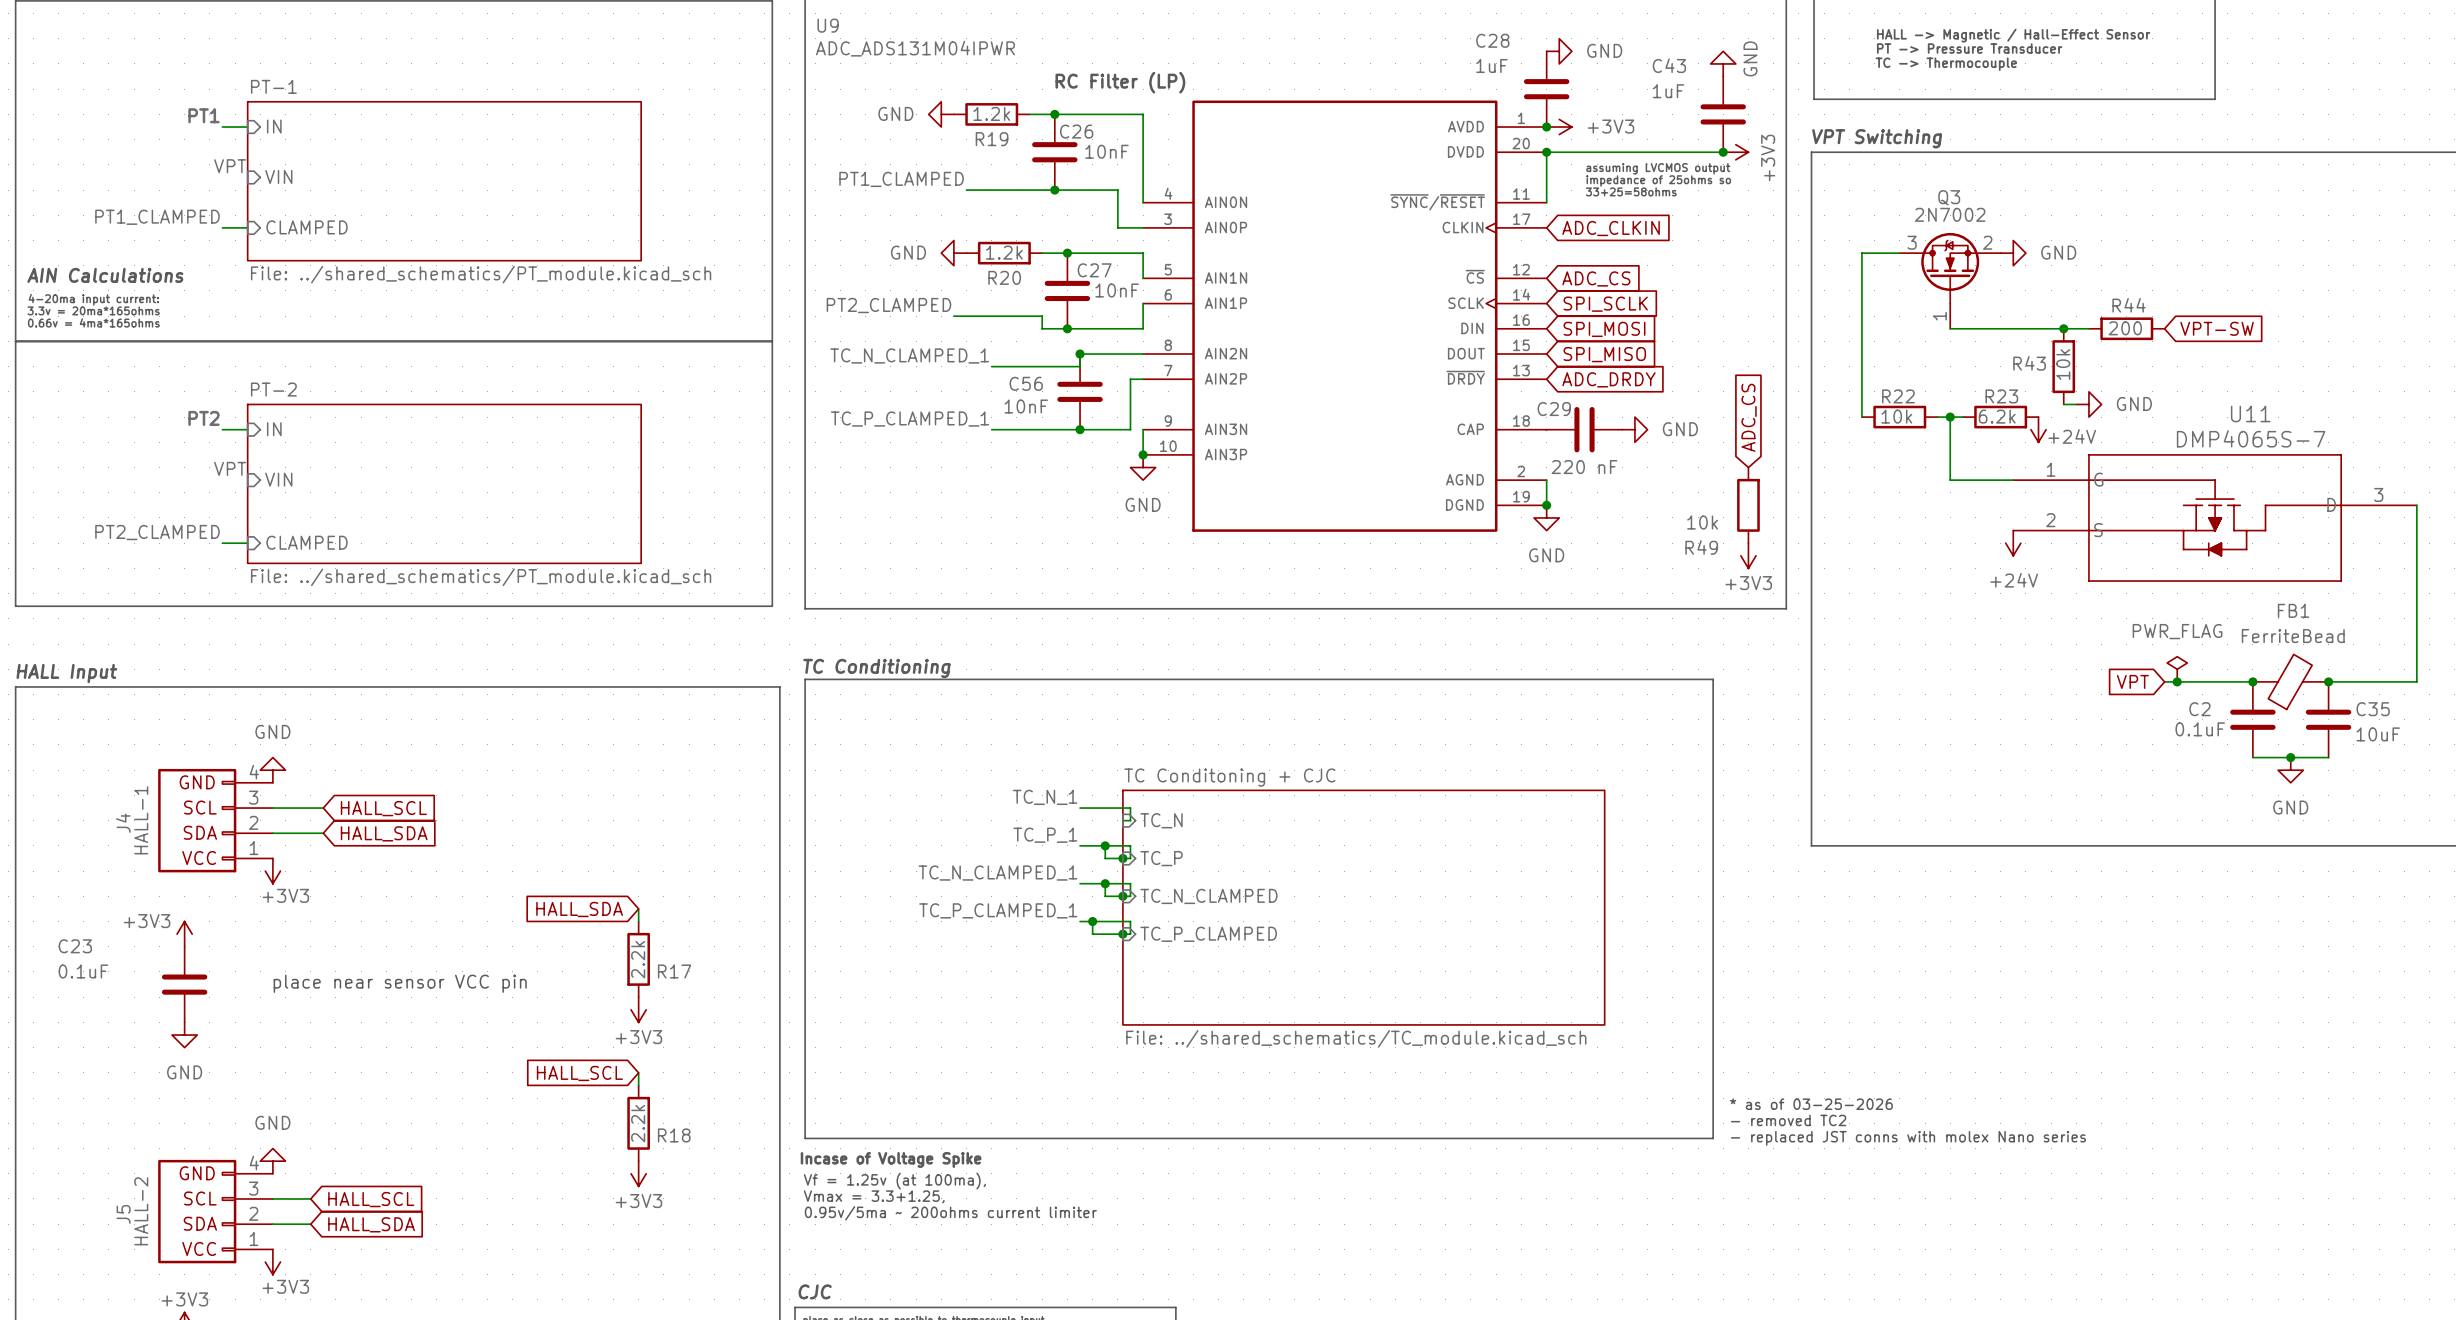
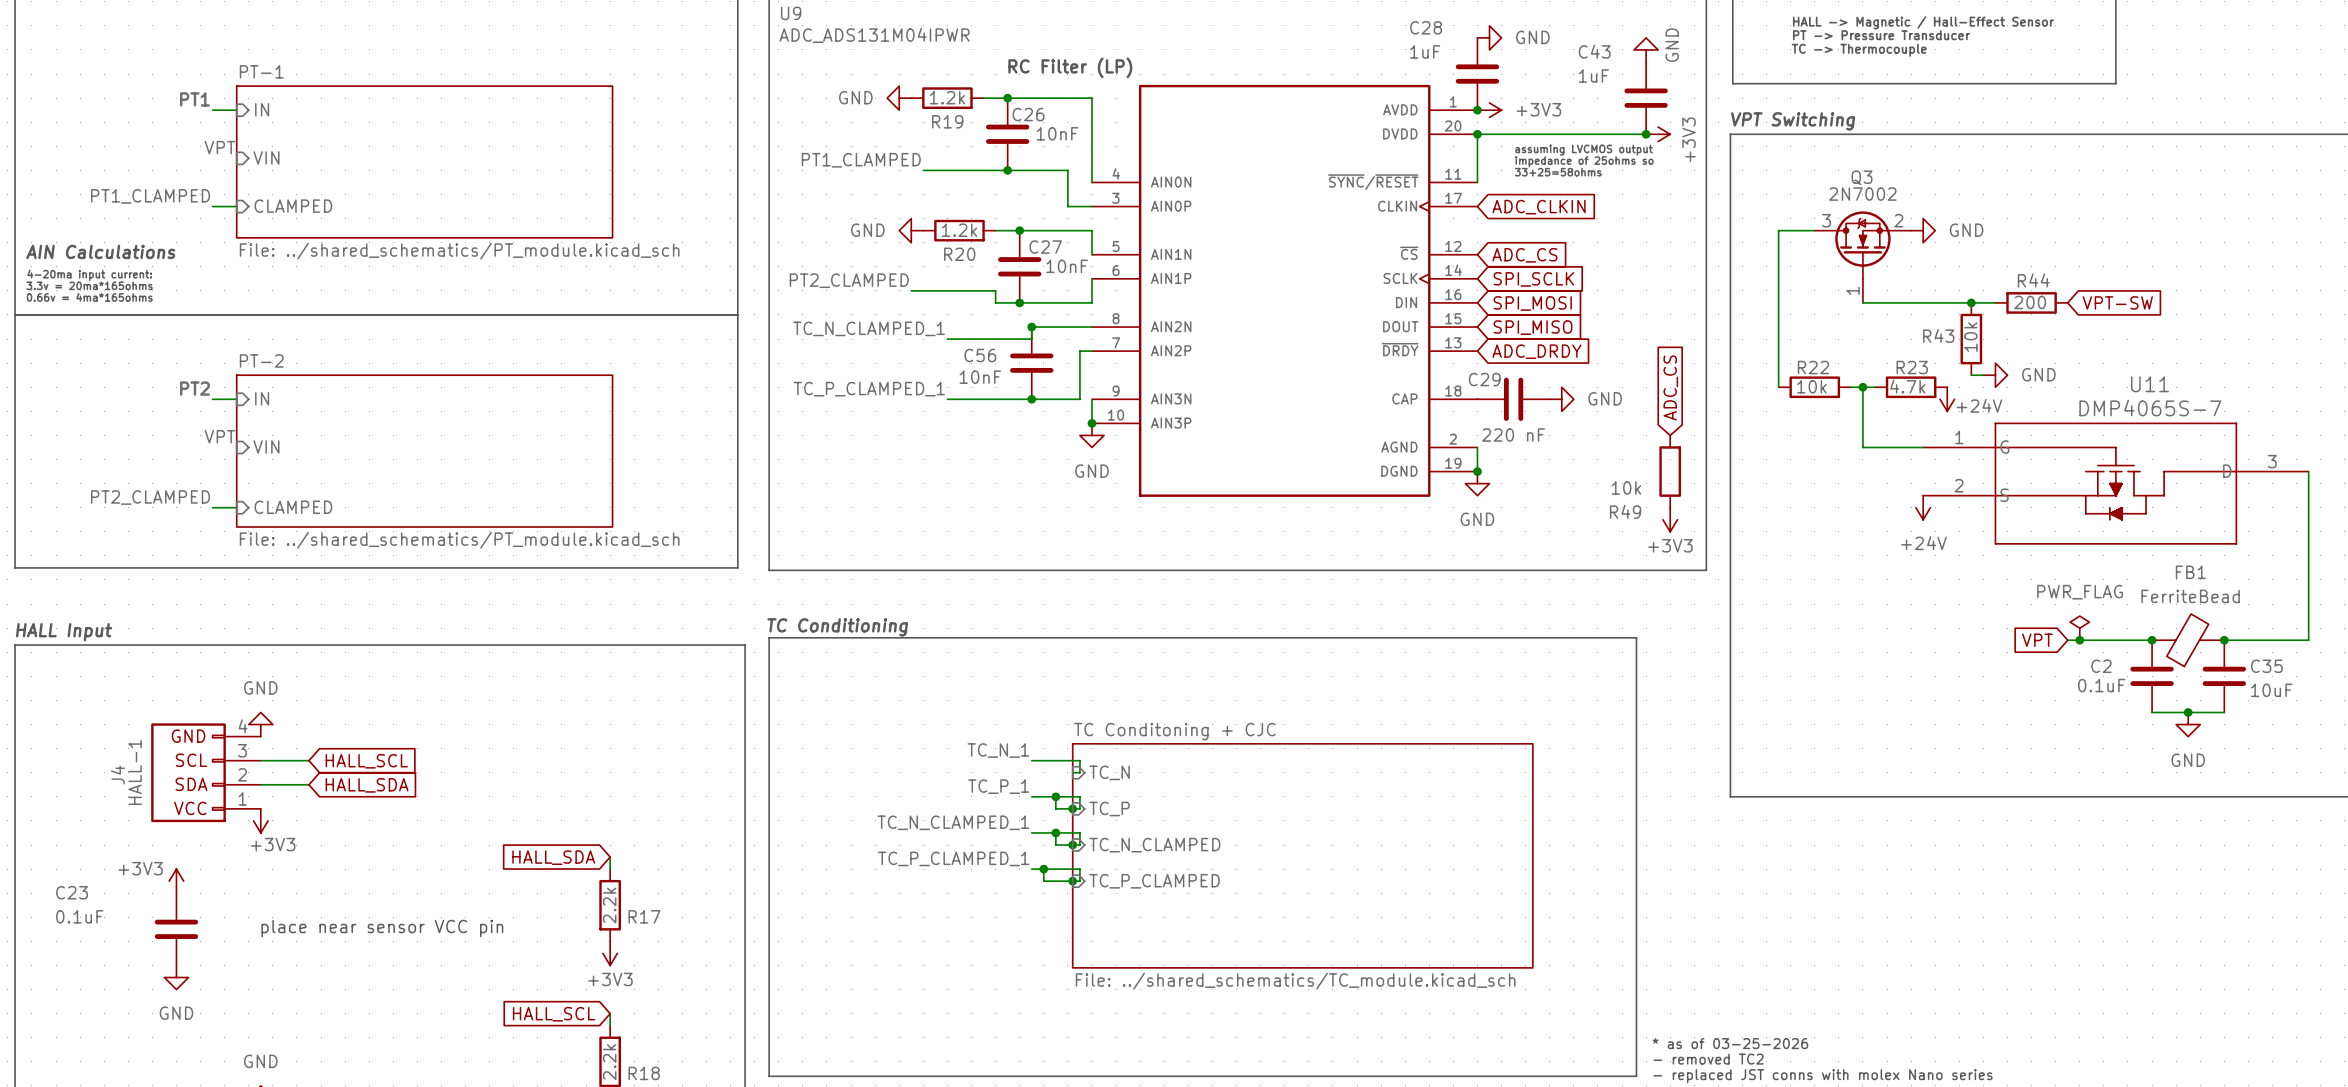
R23 value: 6.2k (1997, 416) -> 4.7k (1907, 386)

